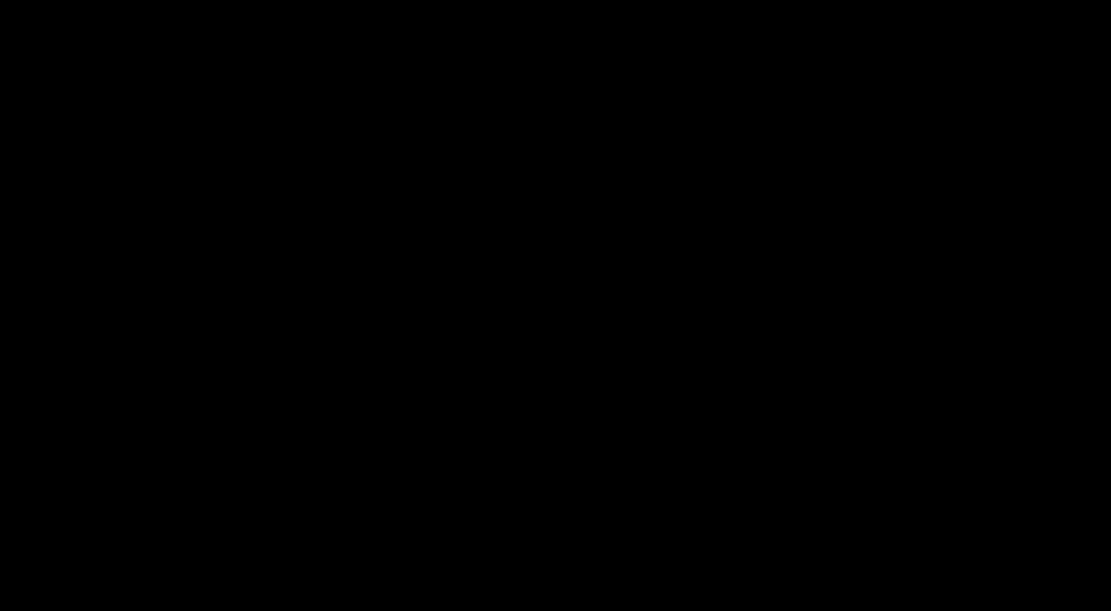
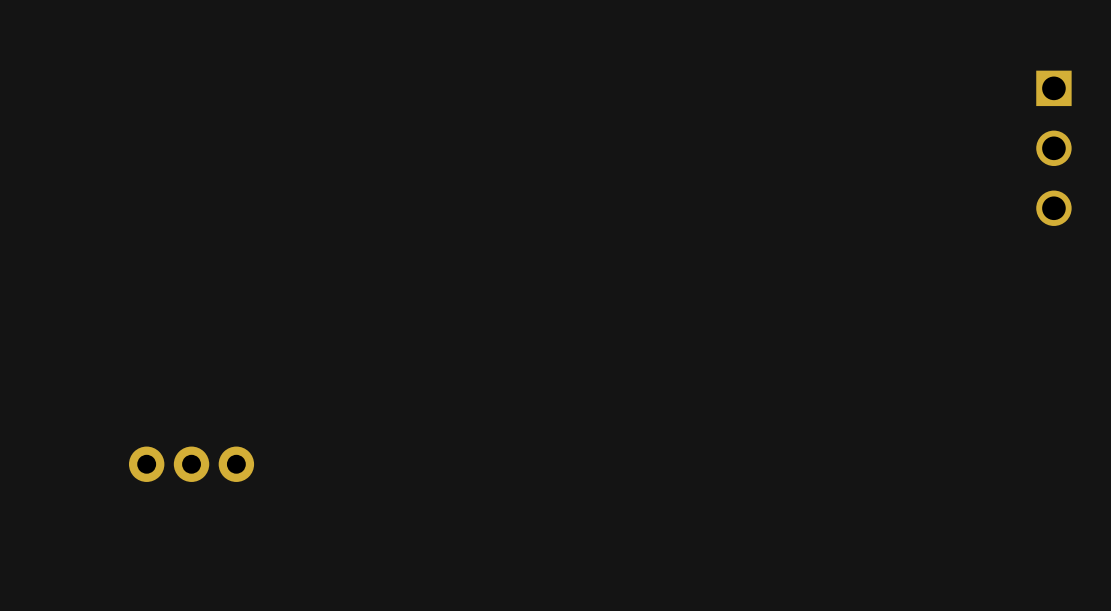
part: none -> (1053, 148)
part: none -> (191, 464)

